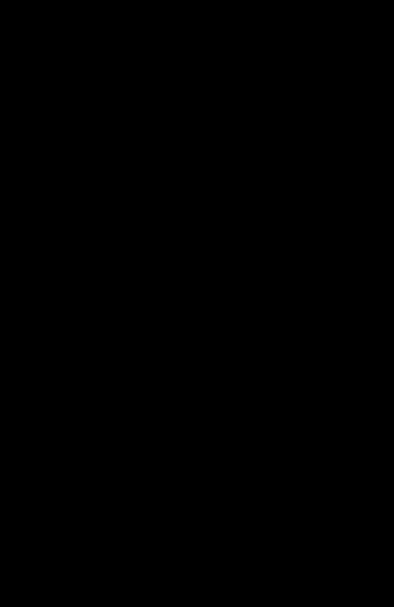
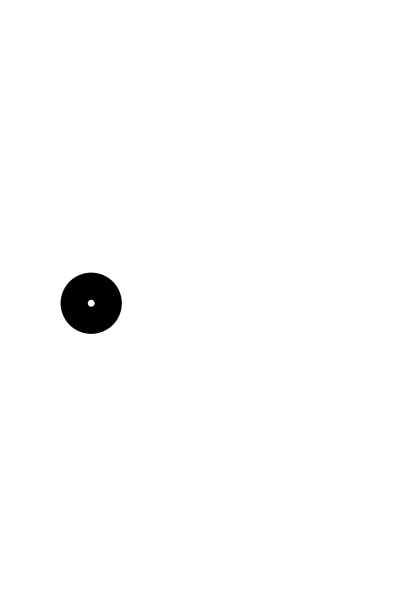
drawing: none -> [60, 272, 122, 334]

